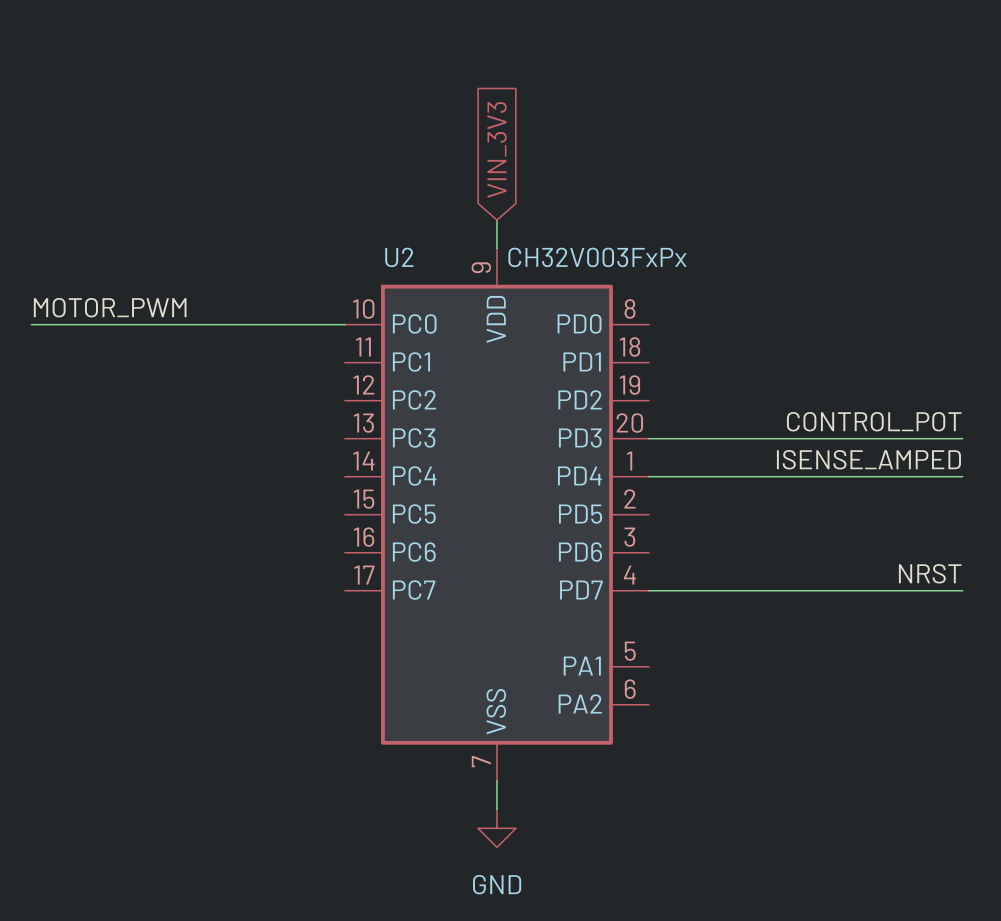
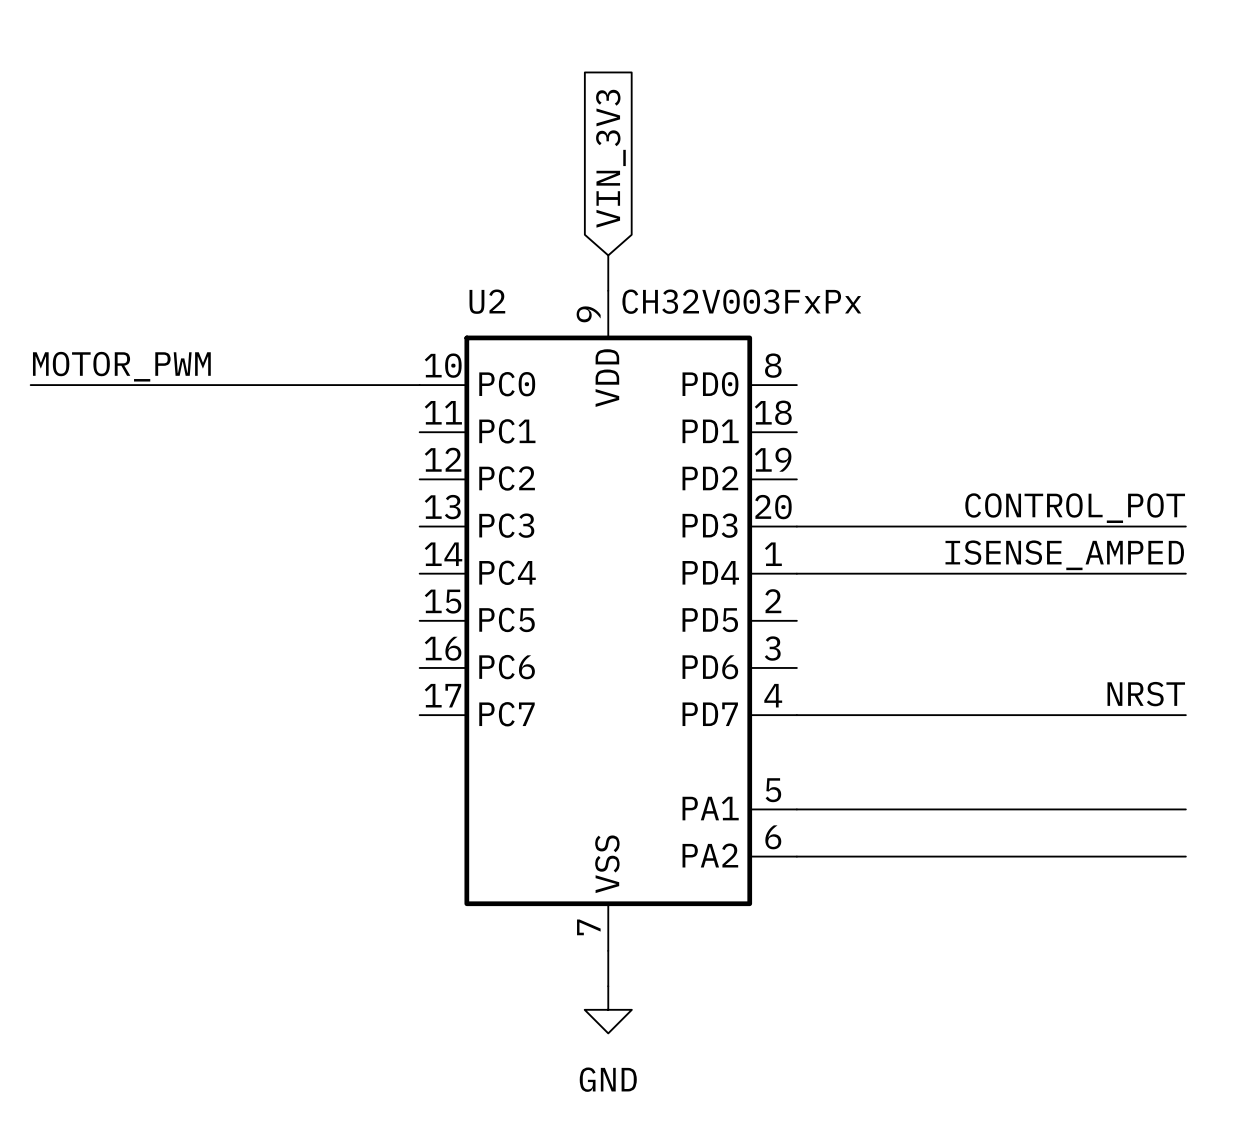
wire: none -> (796, 809) (1185, 809)
wire: none -> (796, 856) (1185, 856)

